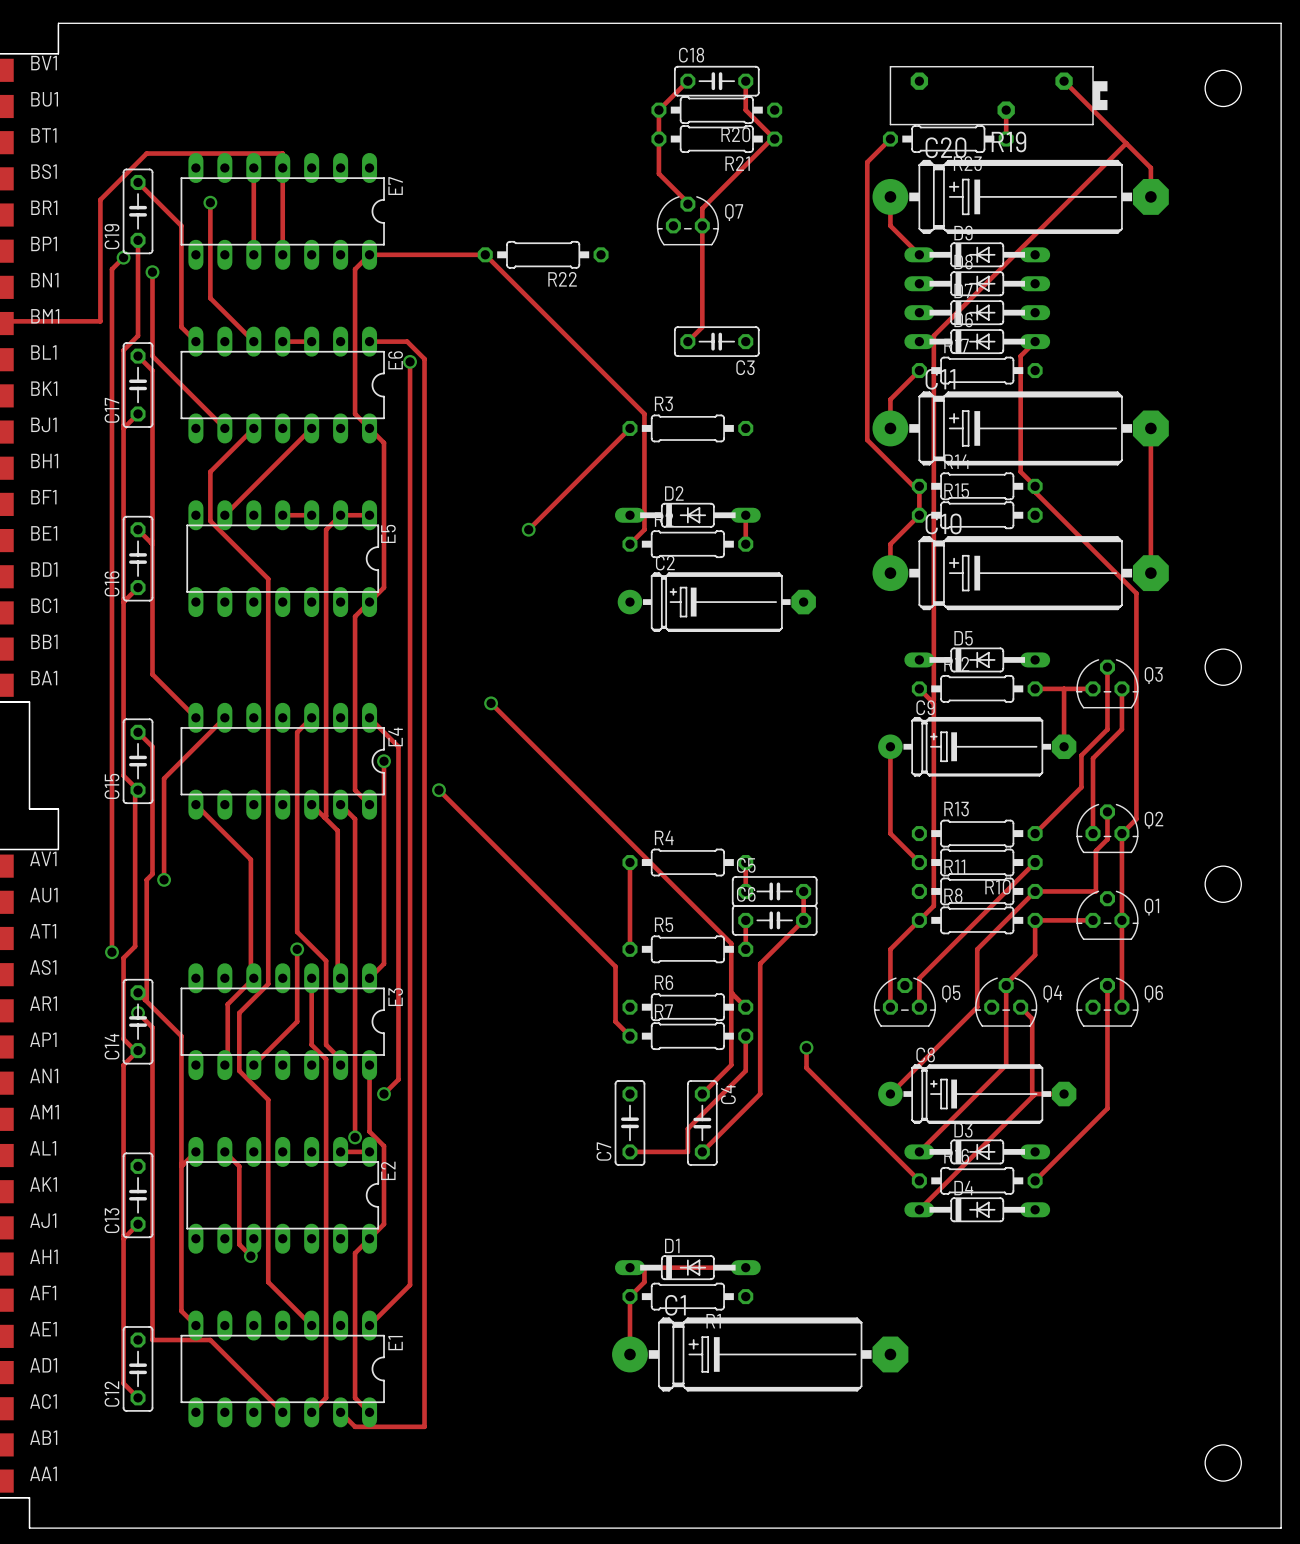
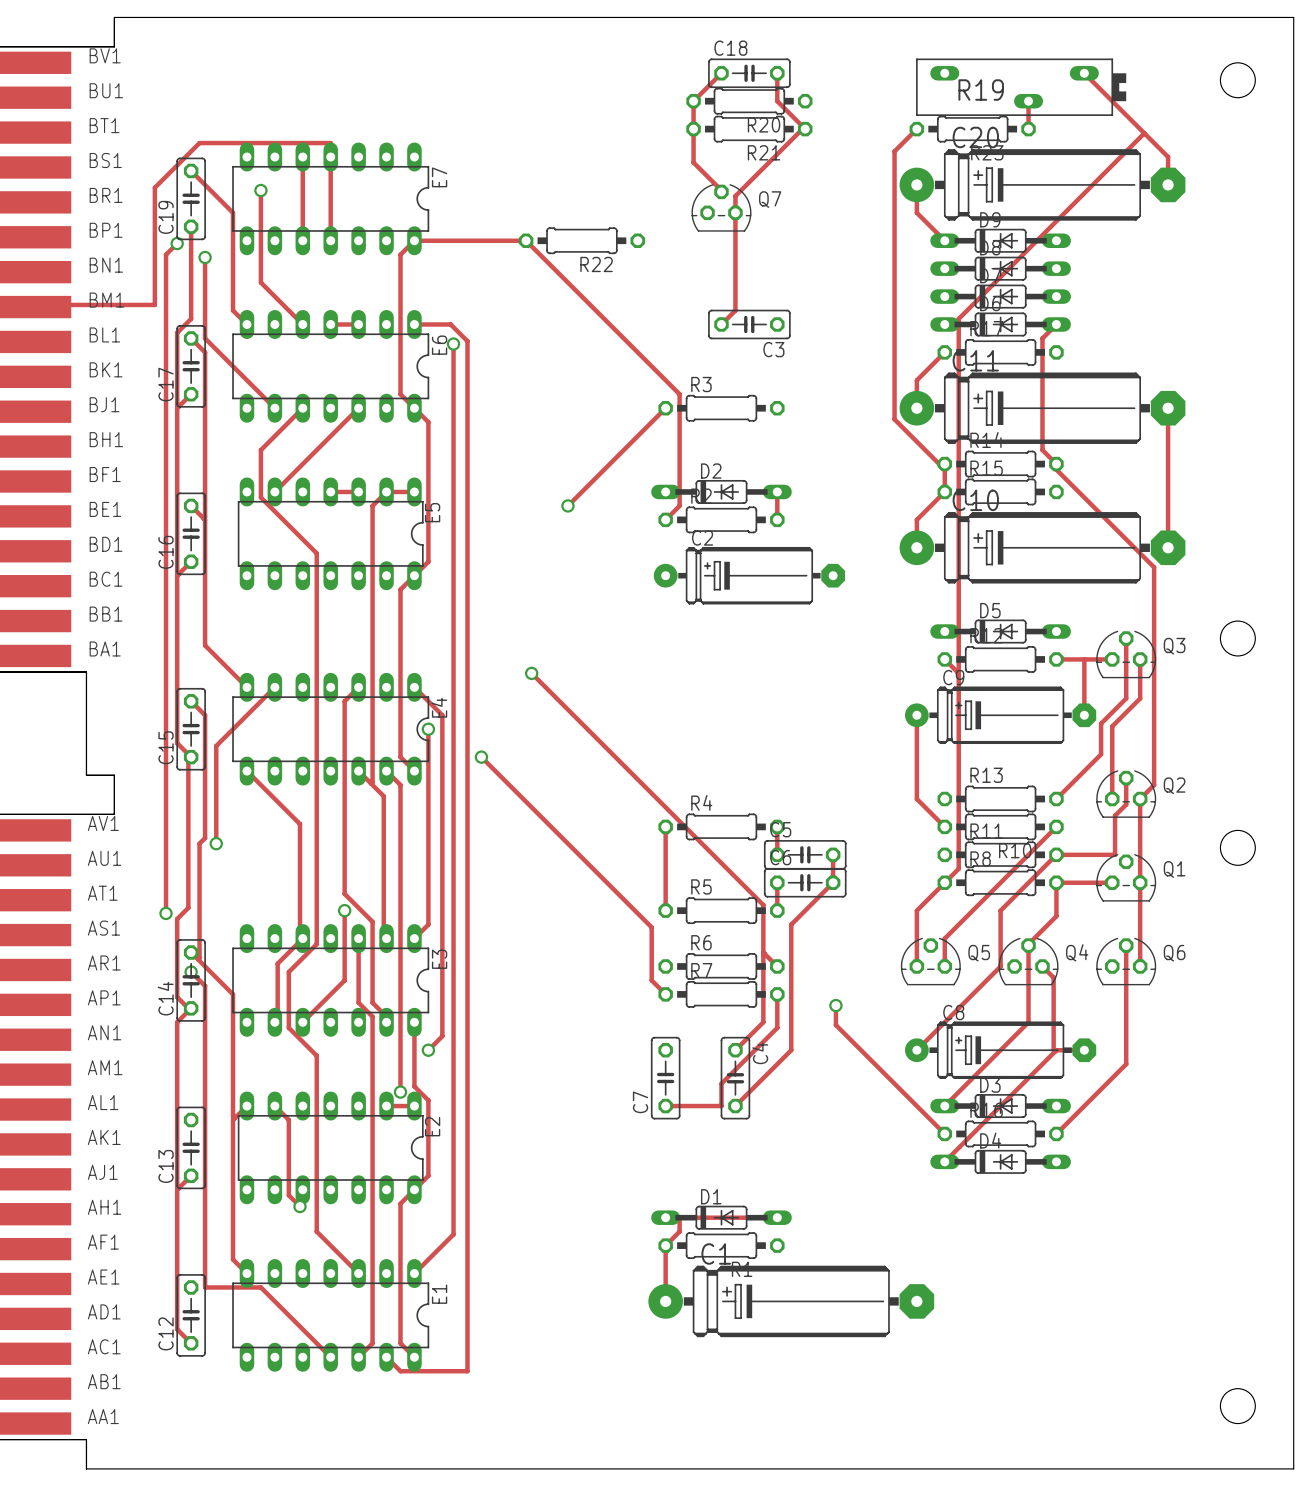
R19 footprint: [889, 65, 1108, 126] -> [916, 58, 1127, 116]
R19 name position: R19 (1008, 141) -> R19 (981, 90)

